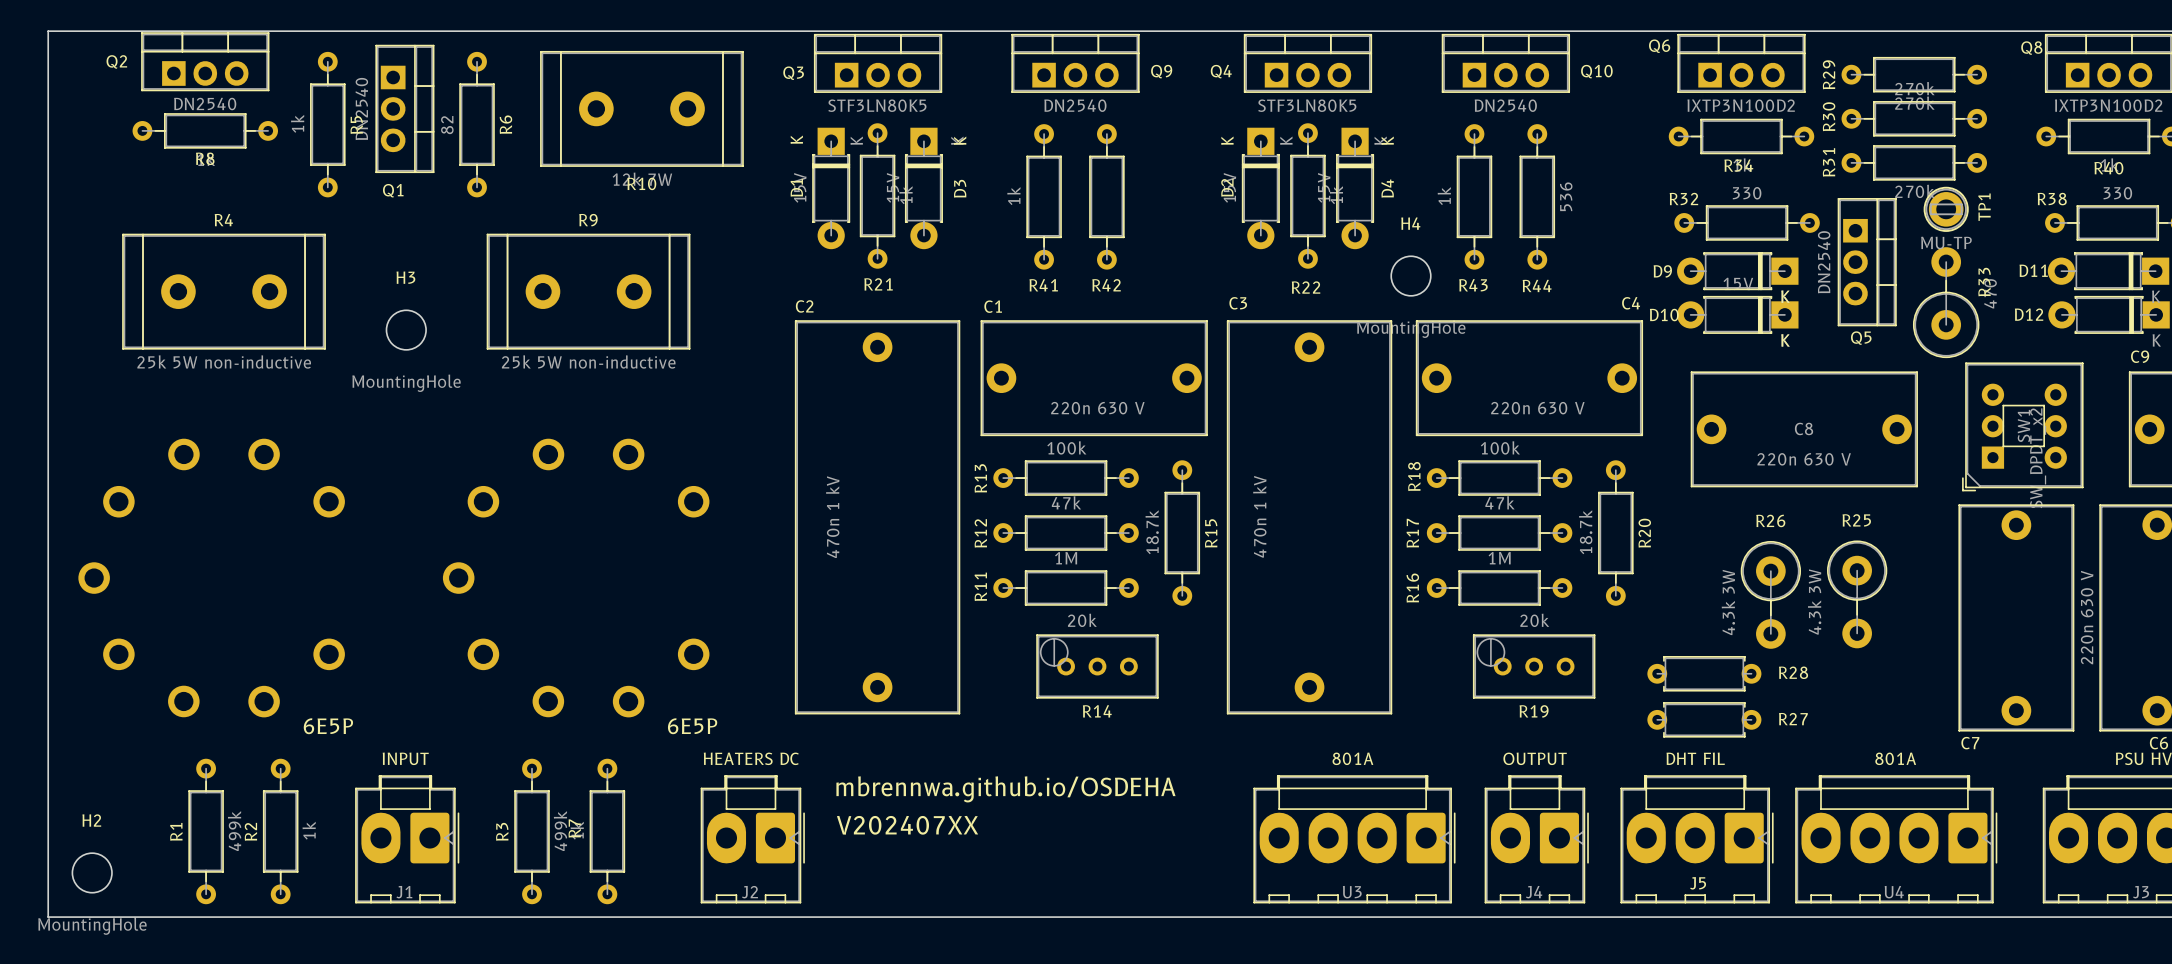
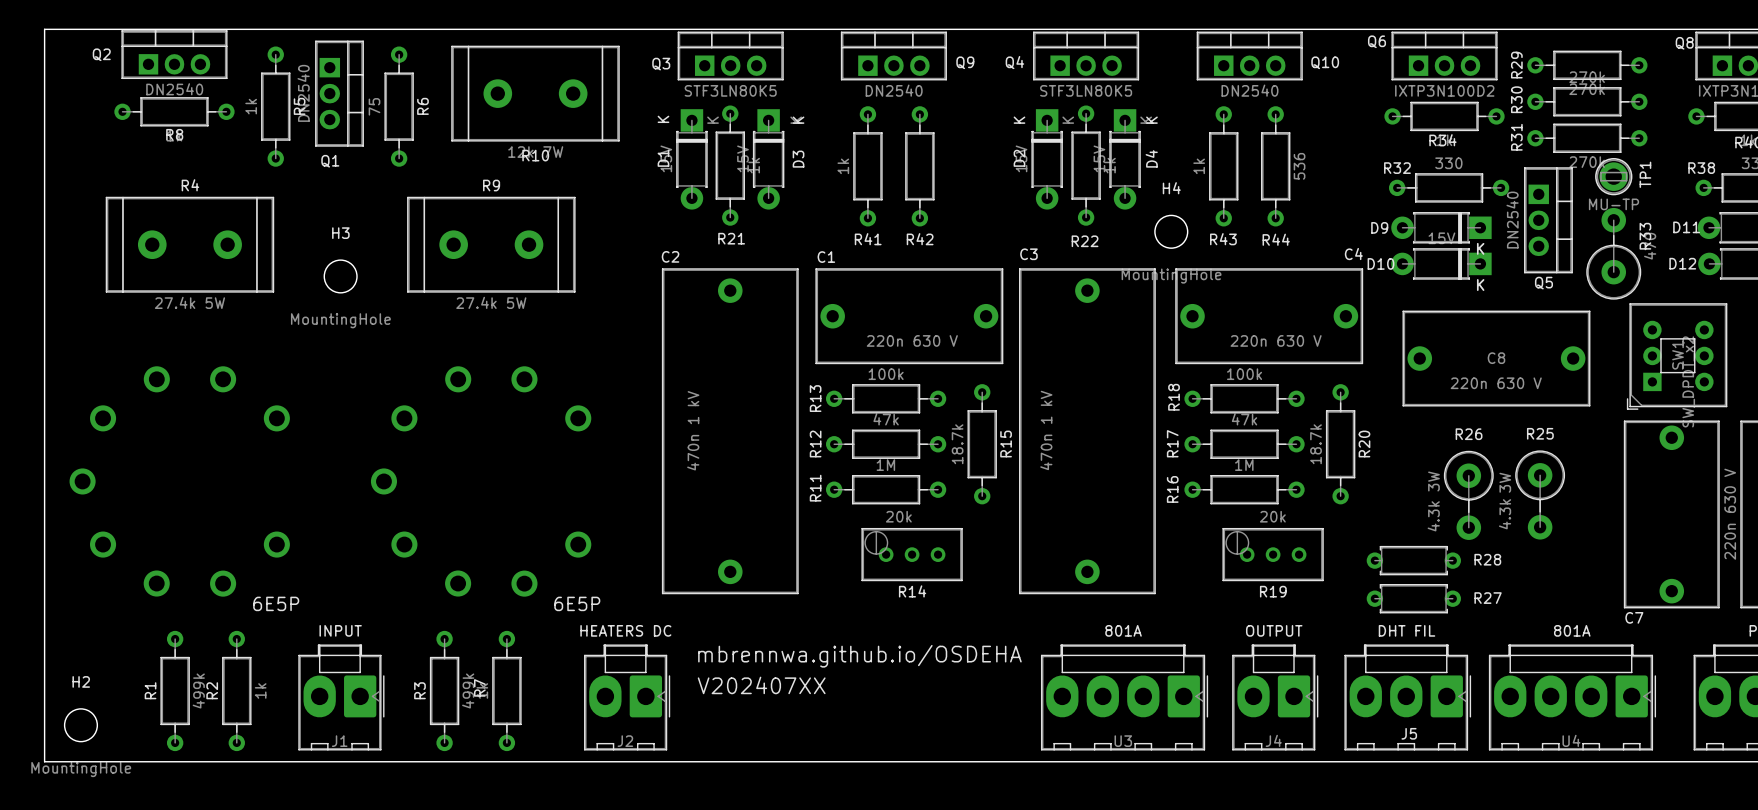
R6 value: 82 (447, 125) -> 75 (374, 106)
R4 value: 25k 5W non-inductive (224, 361) -> 27.4k 5W (189, 302)
R9 value: 25k 5W non-inductive (588, 361) -> 27.4k 5W (491, 302)

